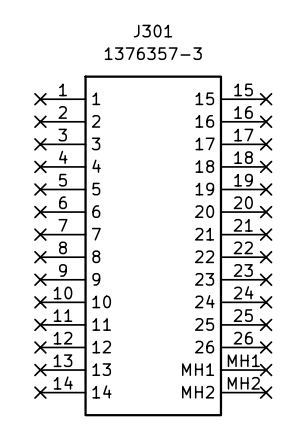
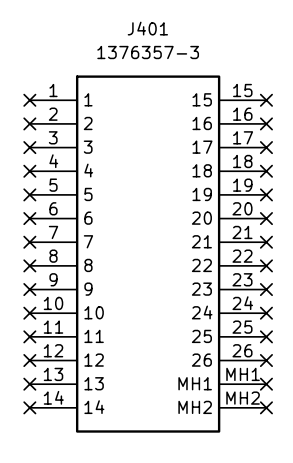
J301 name: J301 (152, 31) -> J401 (147, 28)

